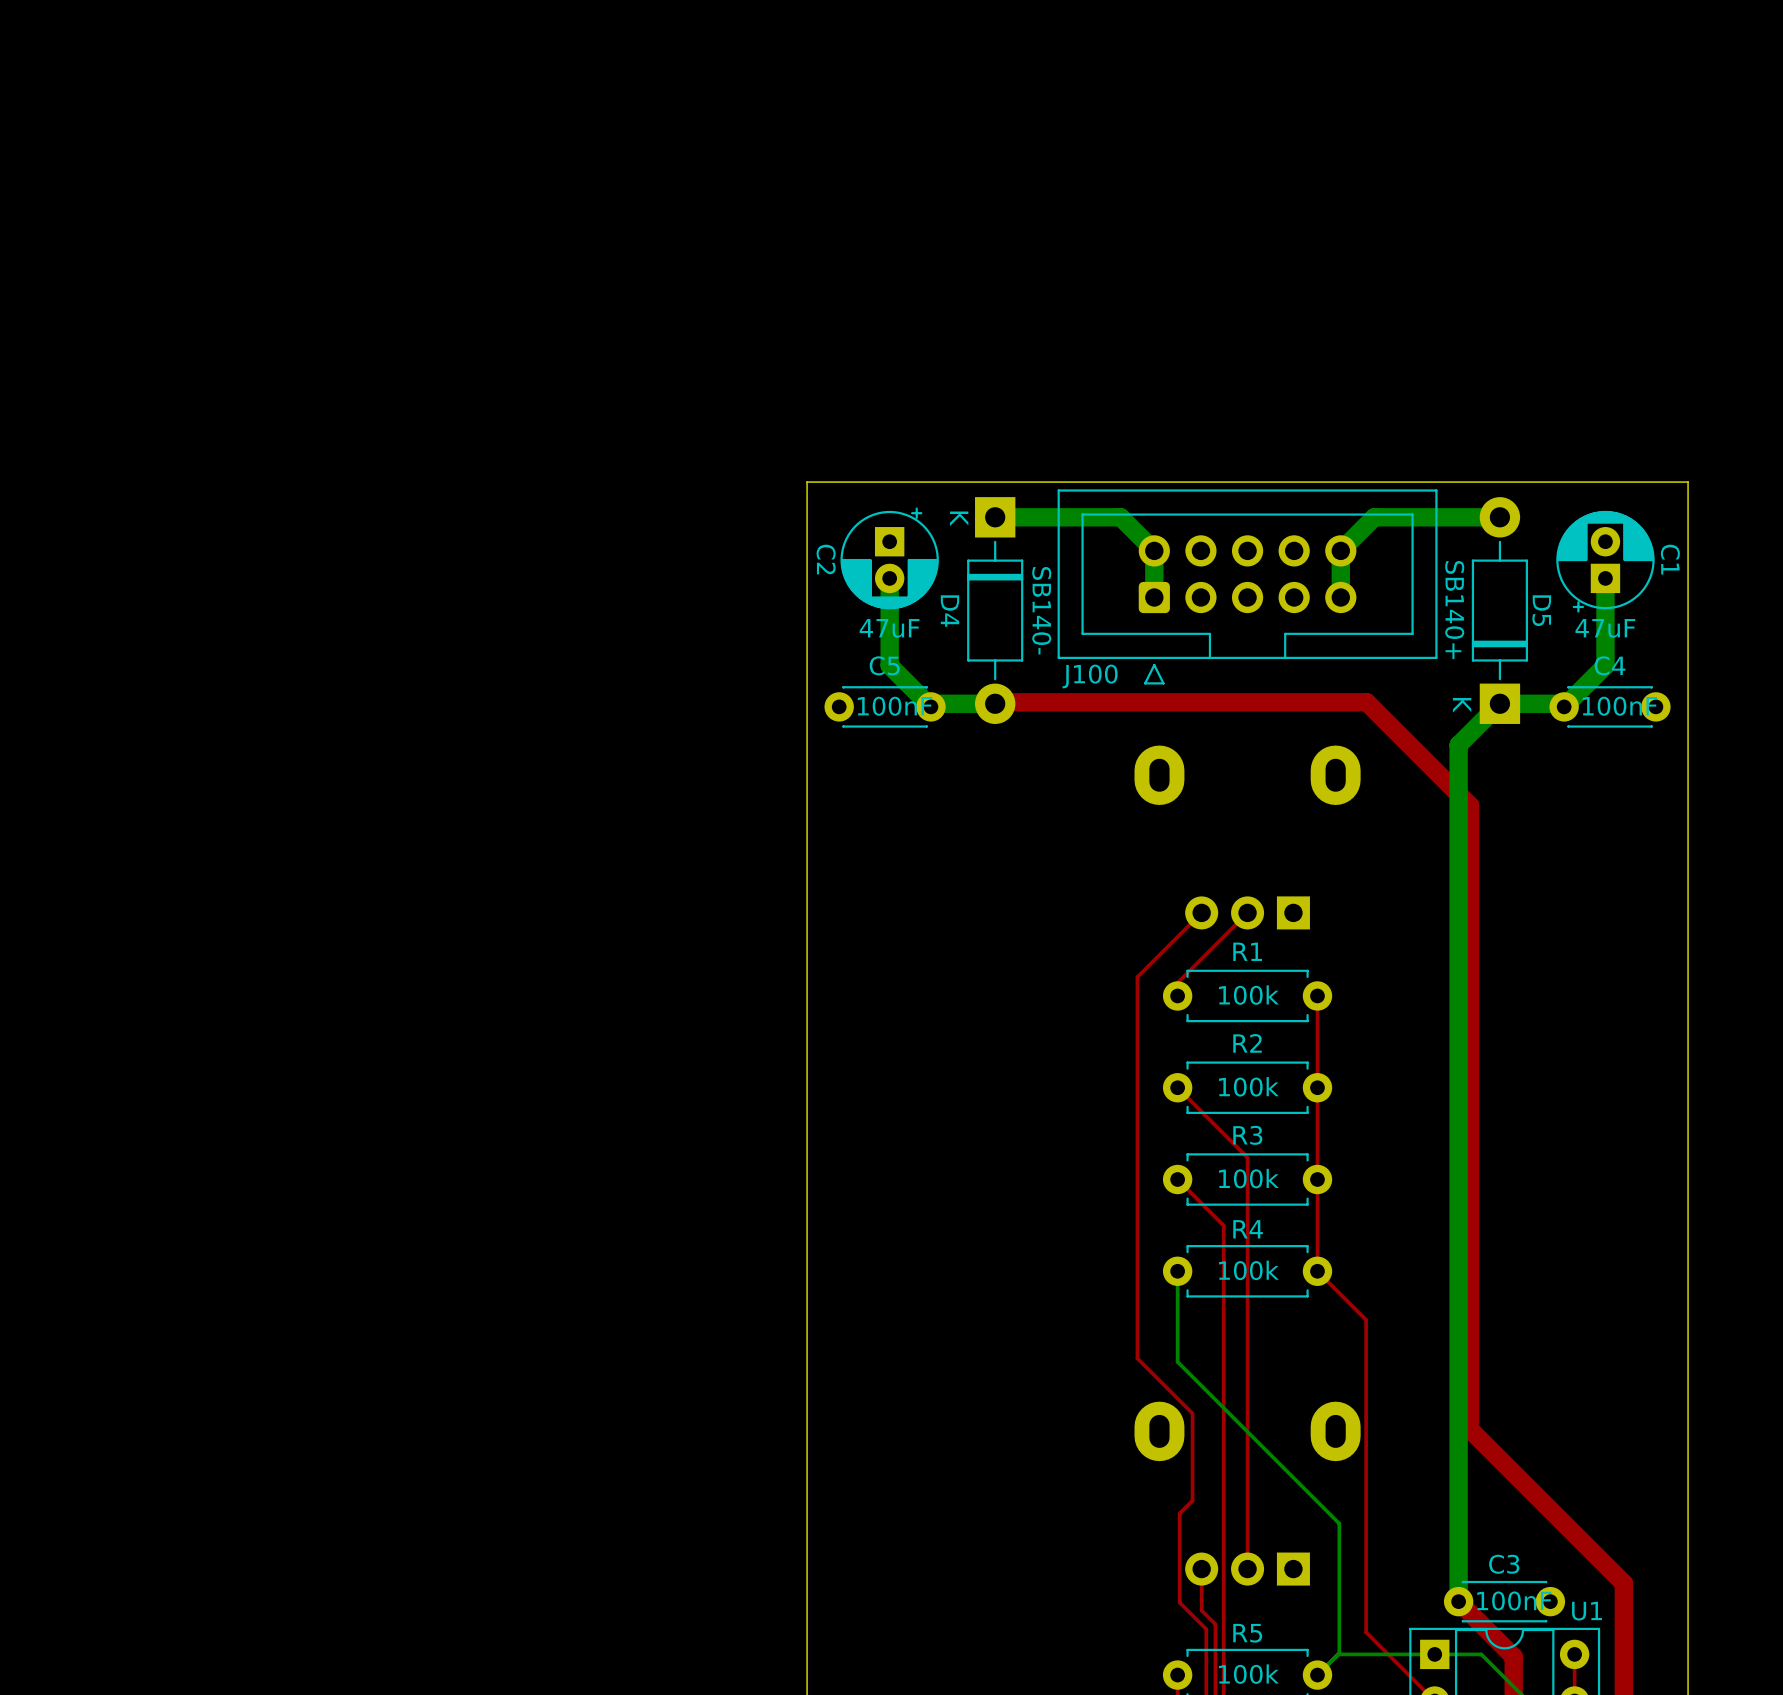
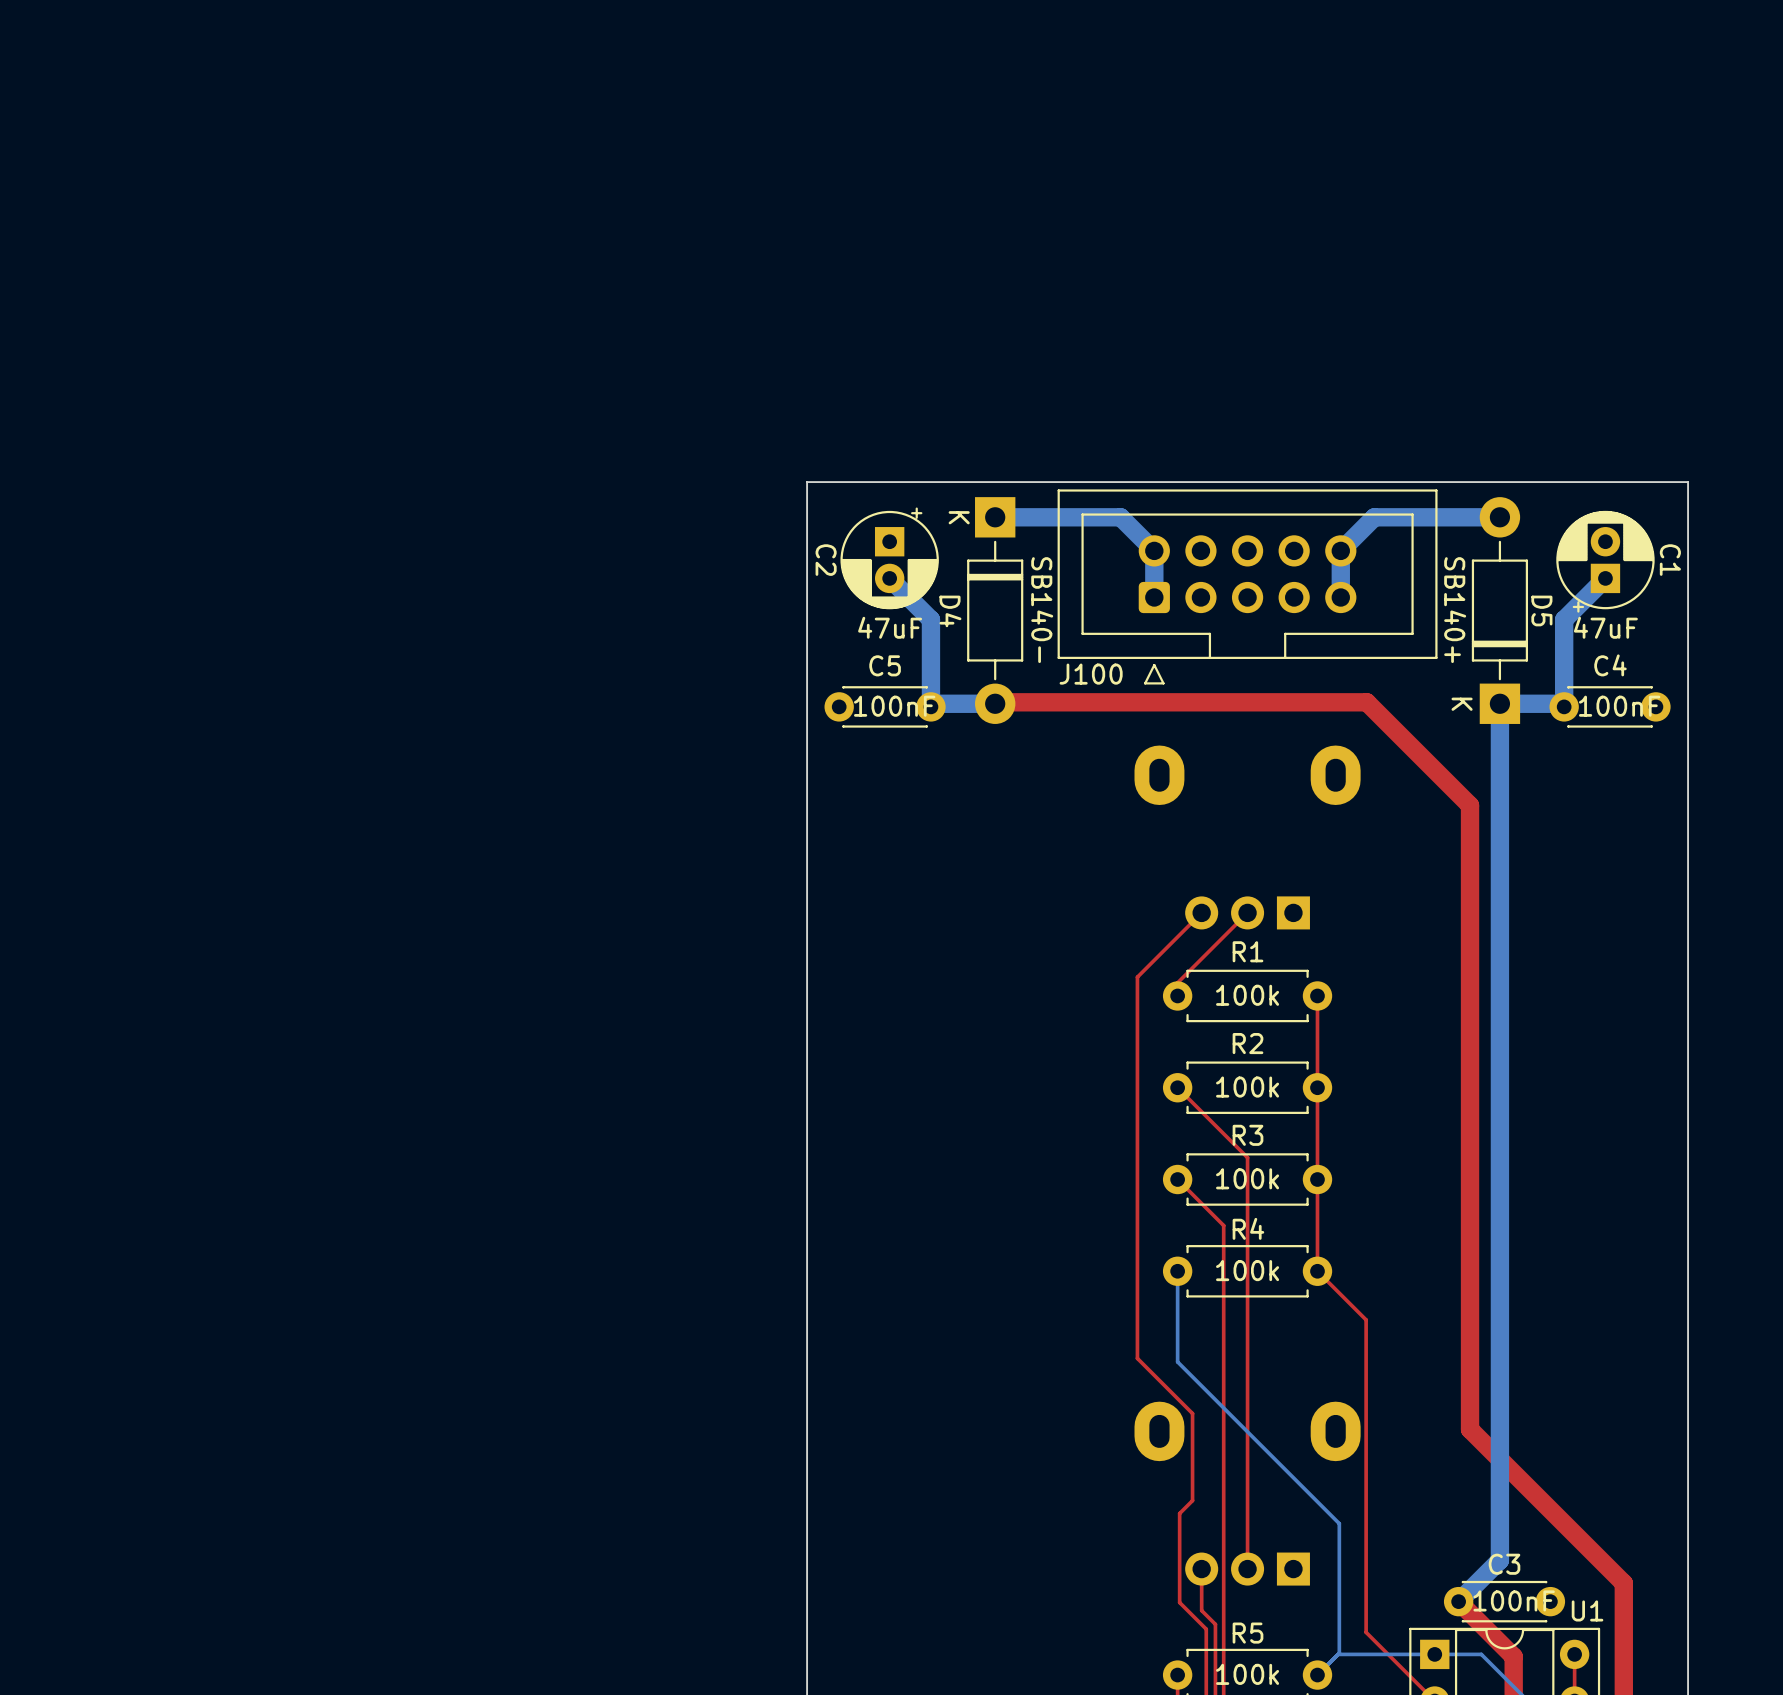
bottom track: (889, 578) (889, 665) (930, 706) -> (889, 578) (930, 619) (930, 706)
bottom track: (1605, 578) (1605, 665) (1564, 706) -> (1605, 578) (1564, 619) (1564, 706)
bottom track: (1499, 703) (1458, 745) (1458, 1601) -> (1499, 703) (1499, 1560) (1458, 1601)

